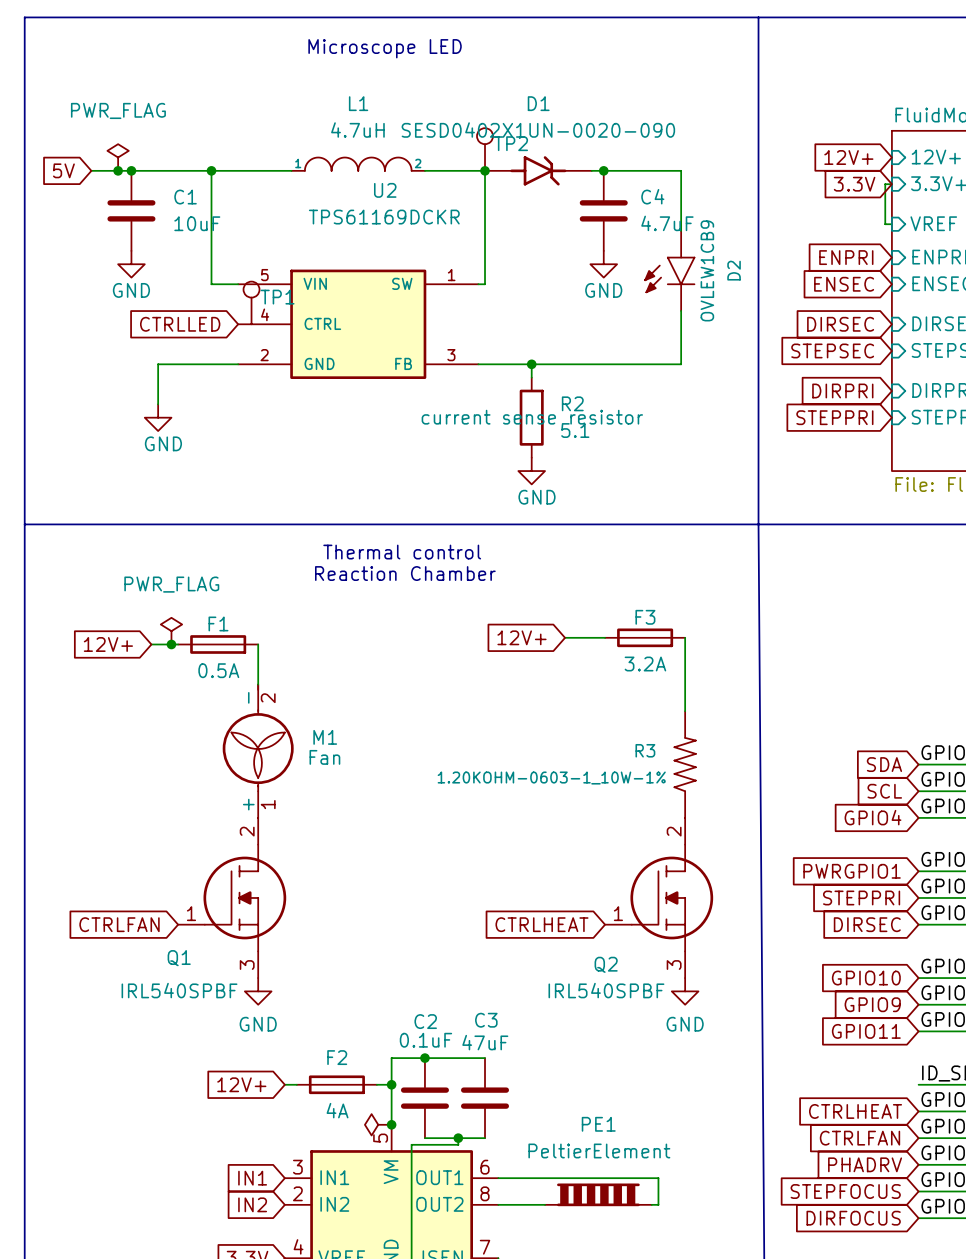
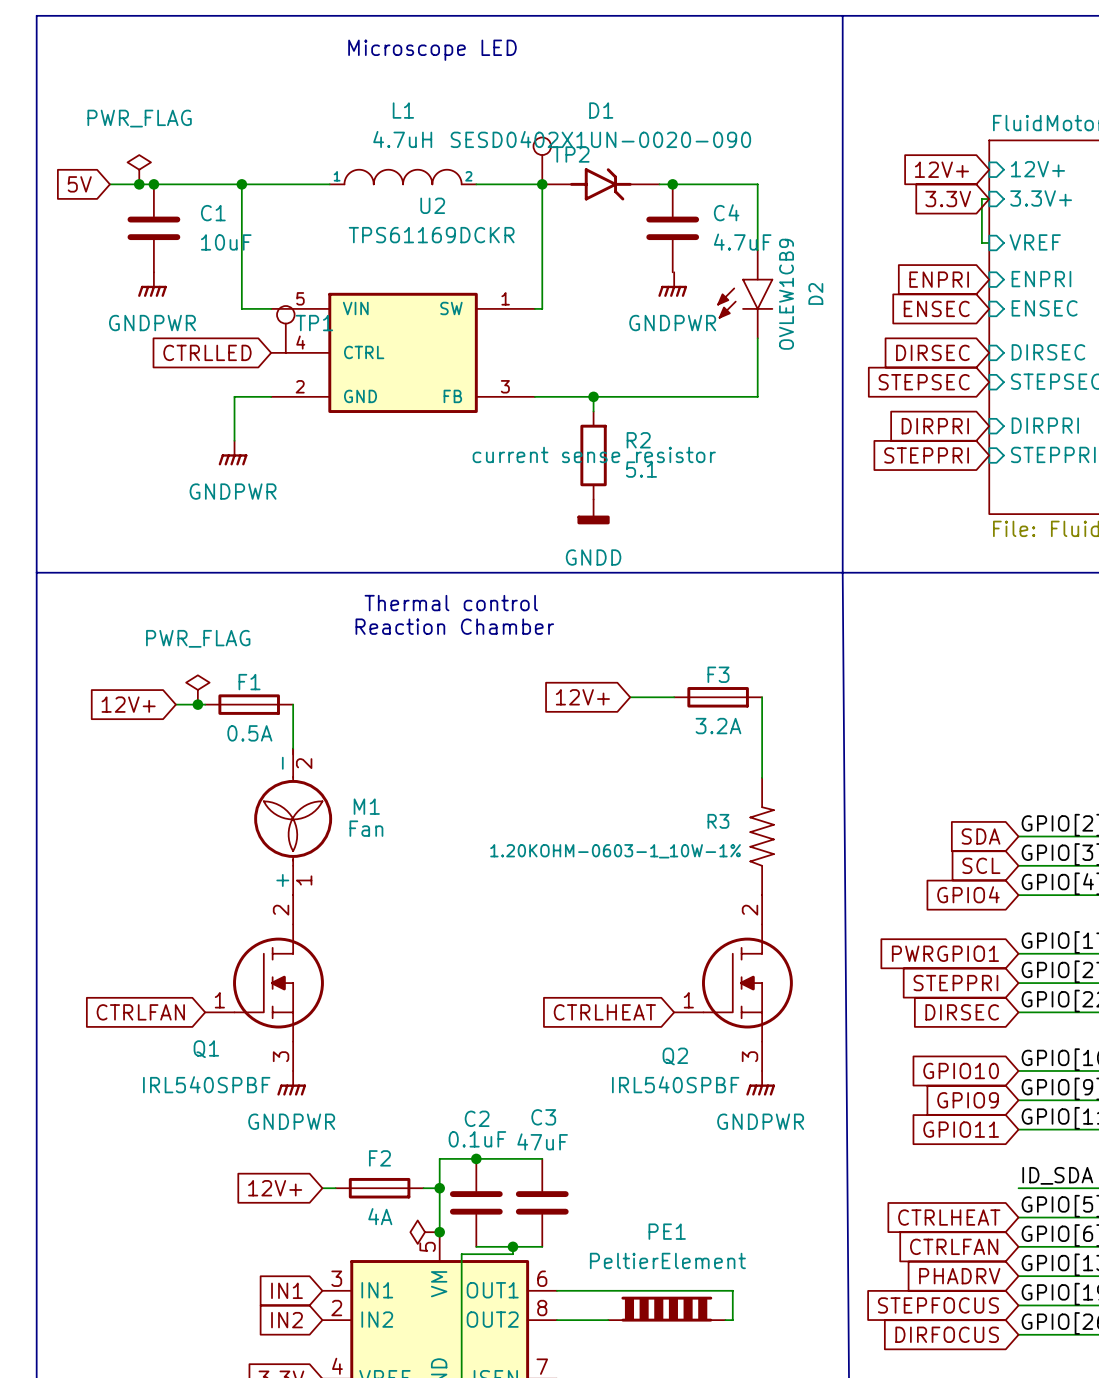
power symbol: GND (131, 264) -> GNDPWR (152, 284)
power symbol: GND (603, 264) -> GNDPWR (672, 284)
wire: (204, 364) (158, 364) (158, 404) -> (234, 396) (234, 440)
power symbol: none -> GNDPWR (233, 453)
power symbol: GND (158, 417) -> none
power symbol: GND (531, 471) -> GNDD (593, 511)
power symbol: GND (258, 991) -> GNDPWR (291, 1083)
power symbol: GND (685, 991) -> GNDPWR (760, 1083)

